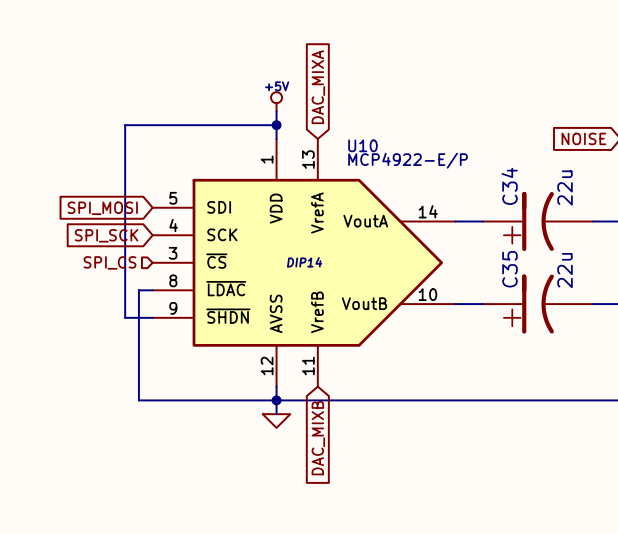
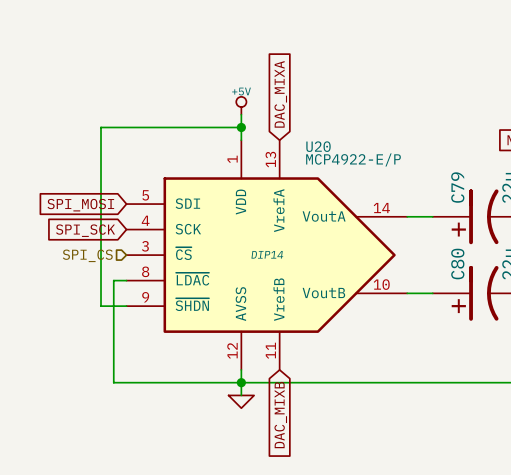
U10 name: U10 (362, 145) -> U20 (318, 146)
C34 name: C34 (509, 186) -> C79 (457, 187)
C35 name: C35 (509, 269) -> C80 (457, 264)

